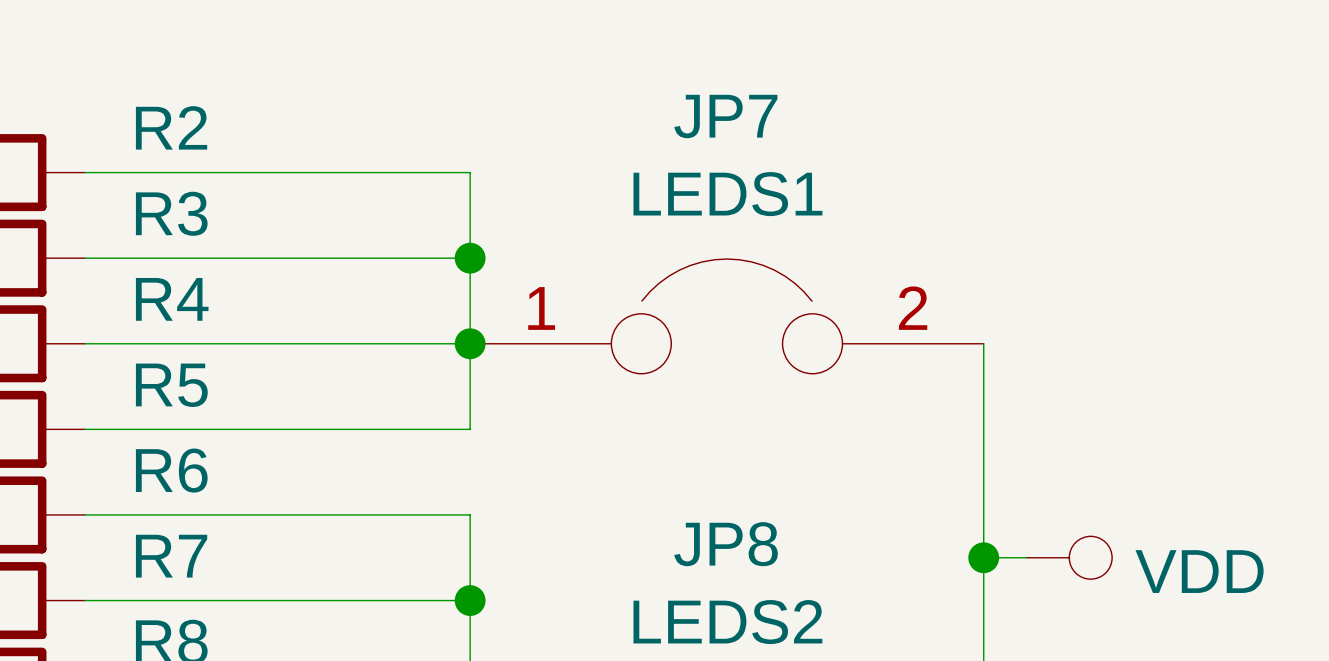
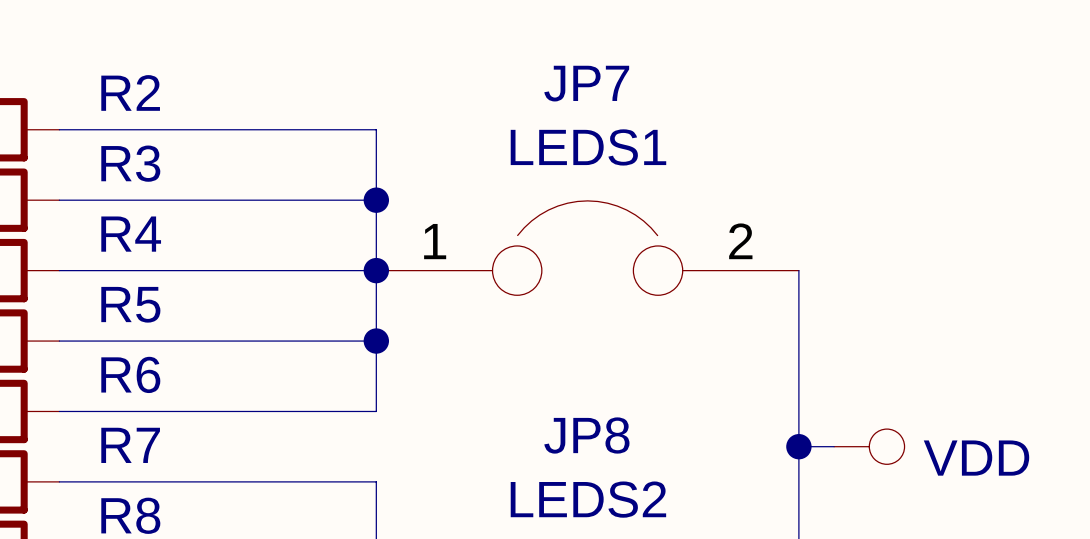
wire: (470, 514) (470, 600) -> (376, 411) (376, 341)
junction position: (470, 600) -> (376, 341)

